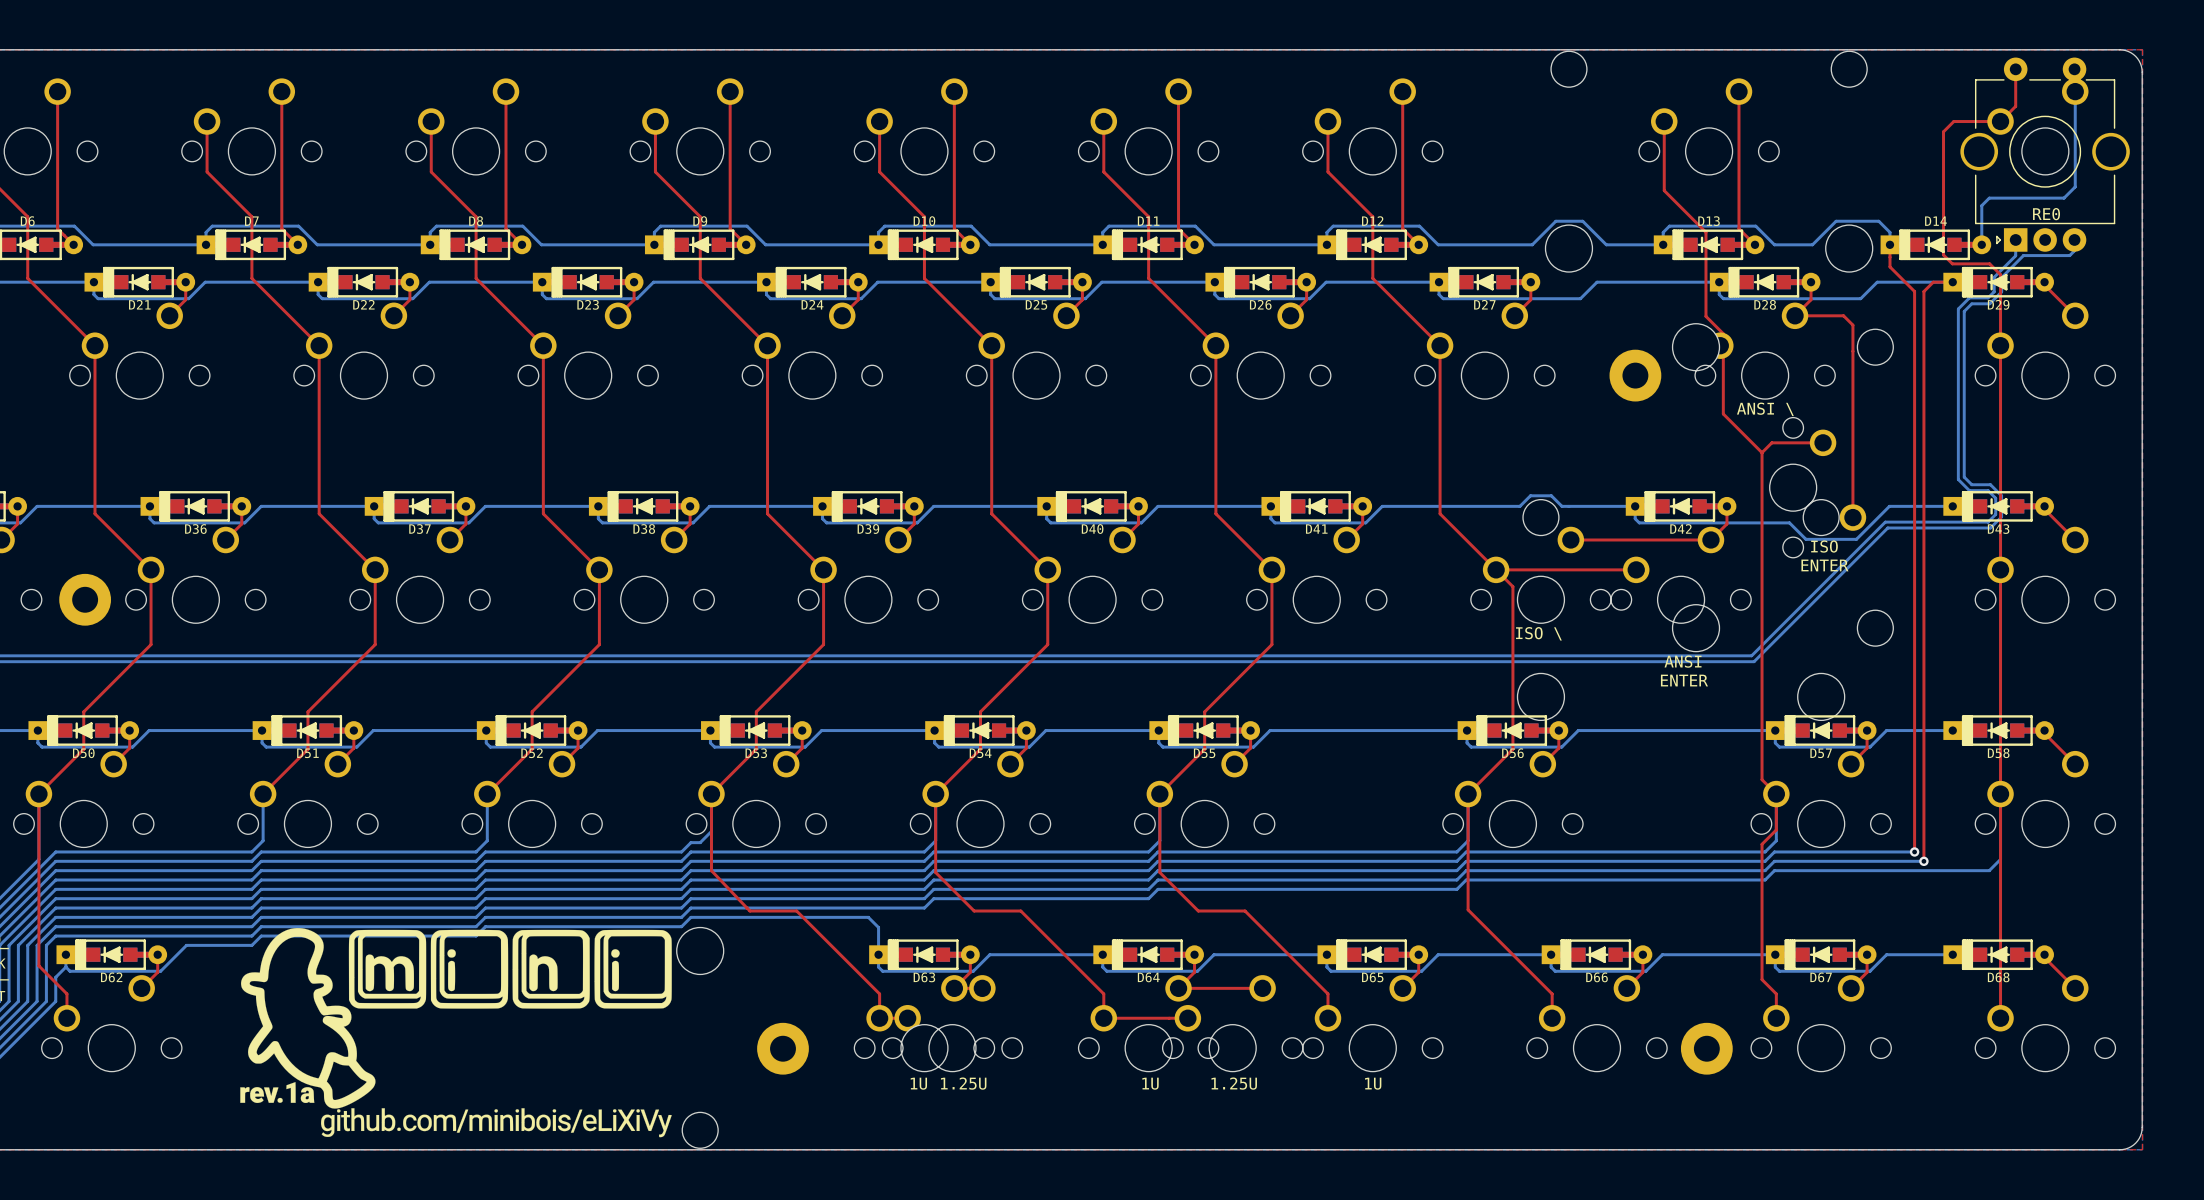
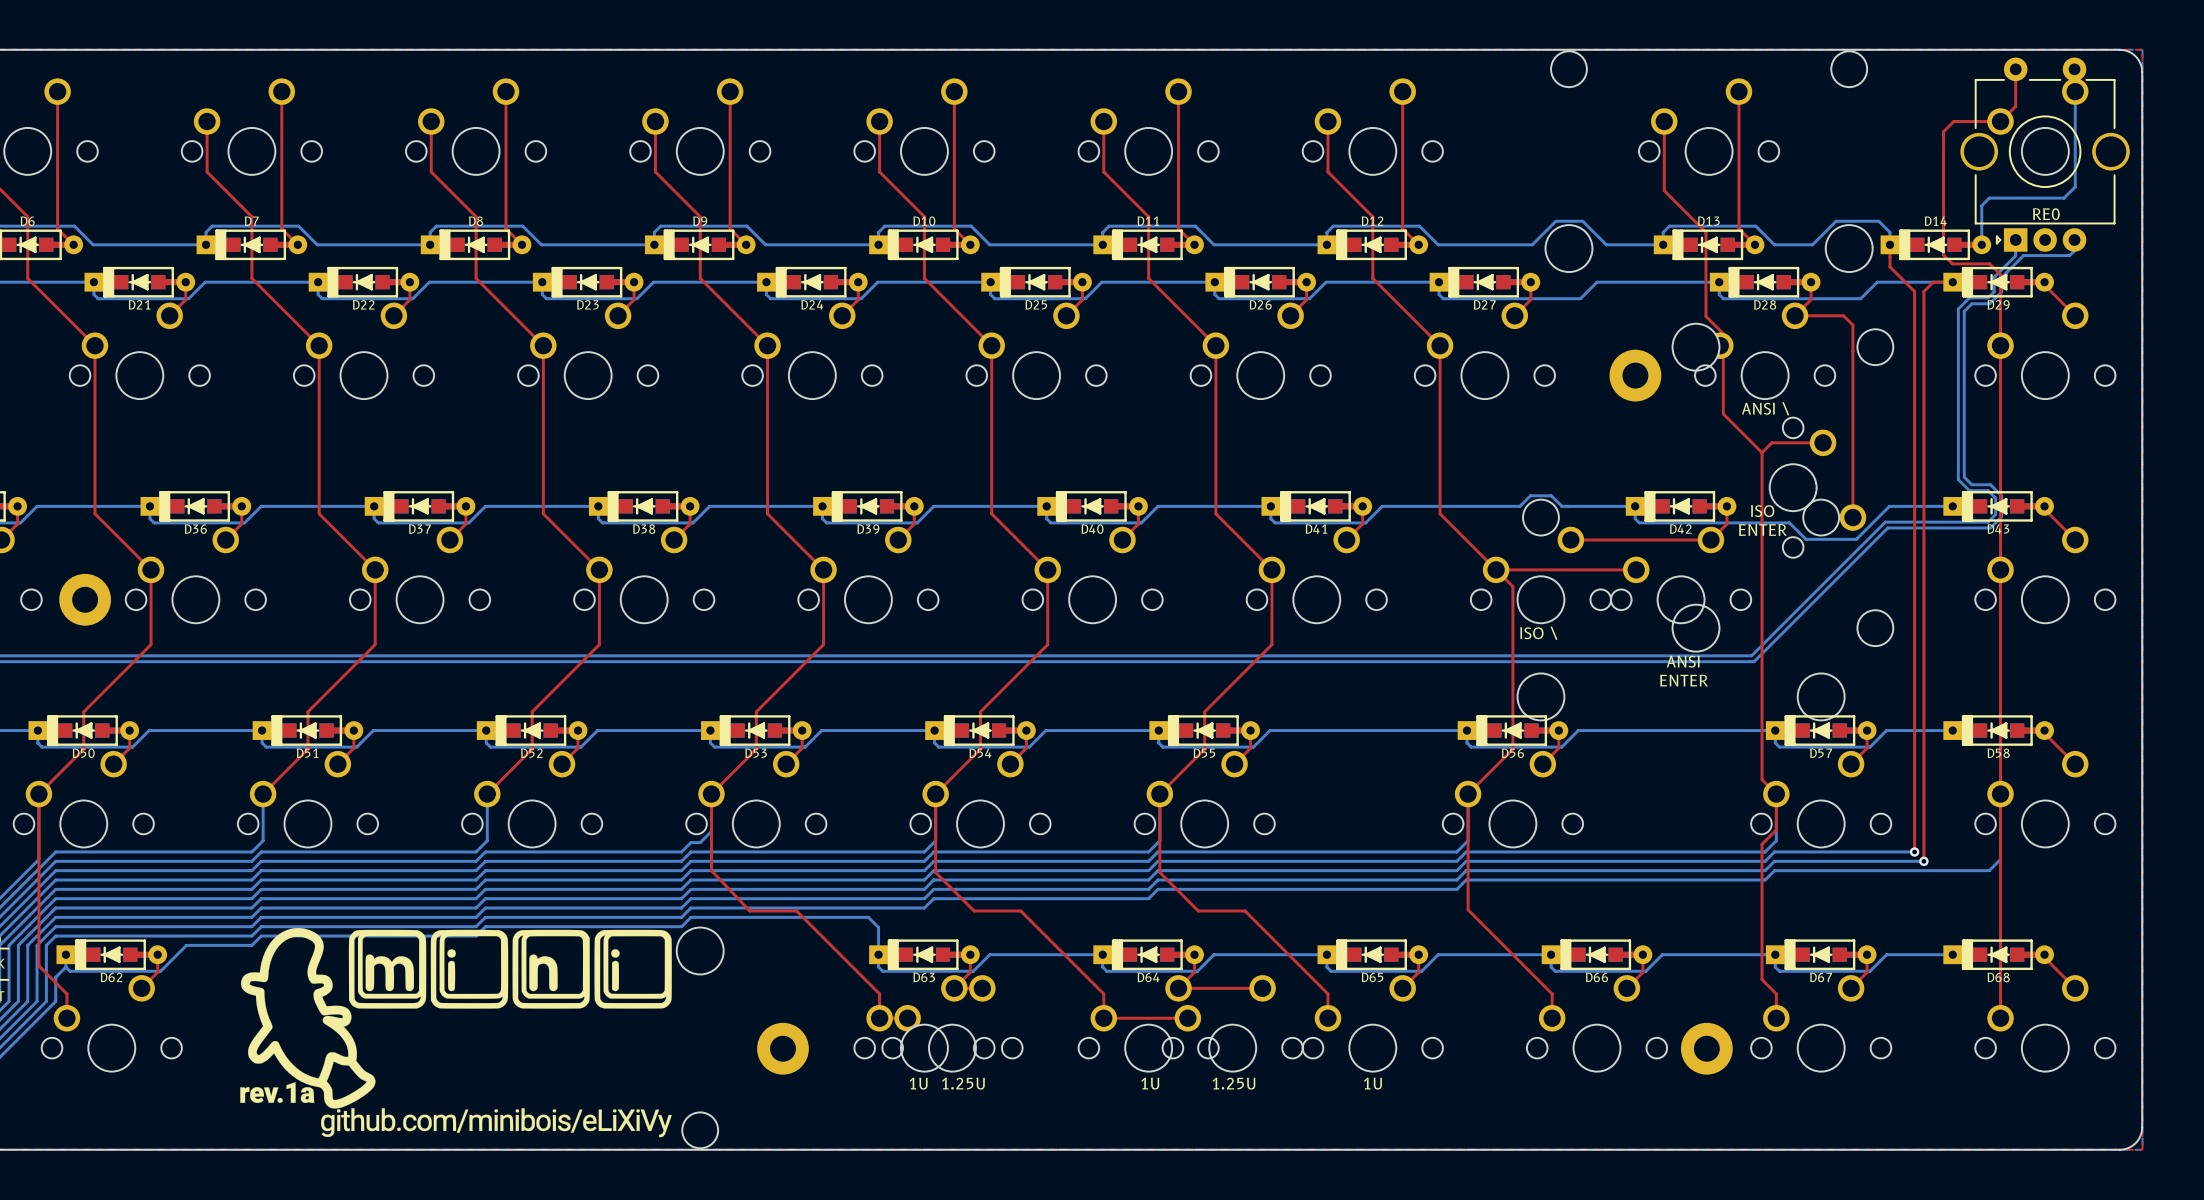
text position: ISO (1824, 546) -> ISO (1762, 511)
text position: ENTER (1824, 565) -> ENTER (1762, 529)

